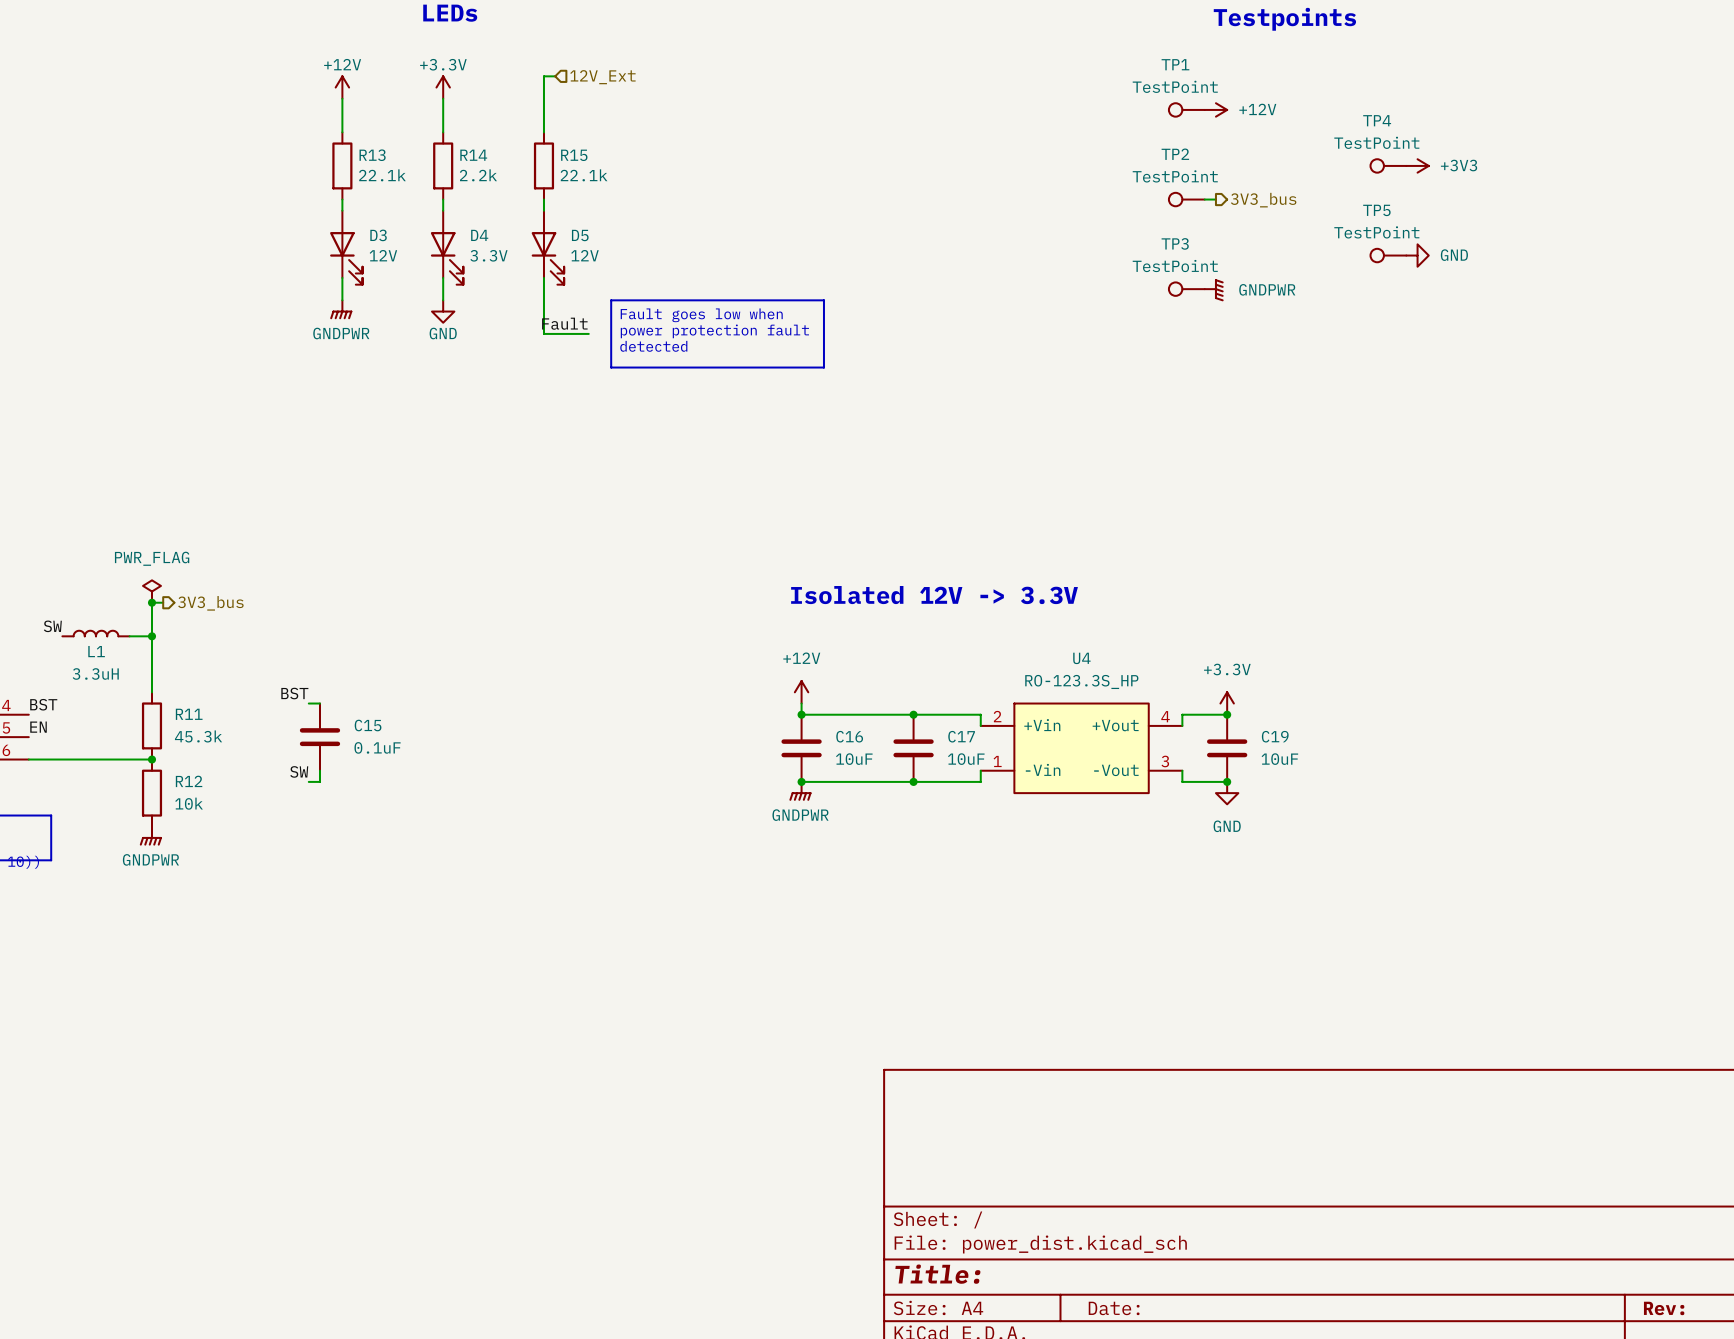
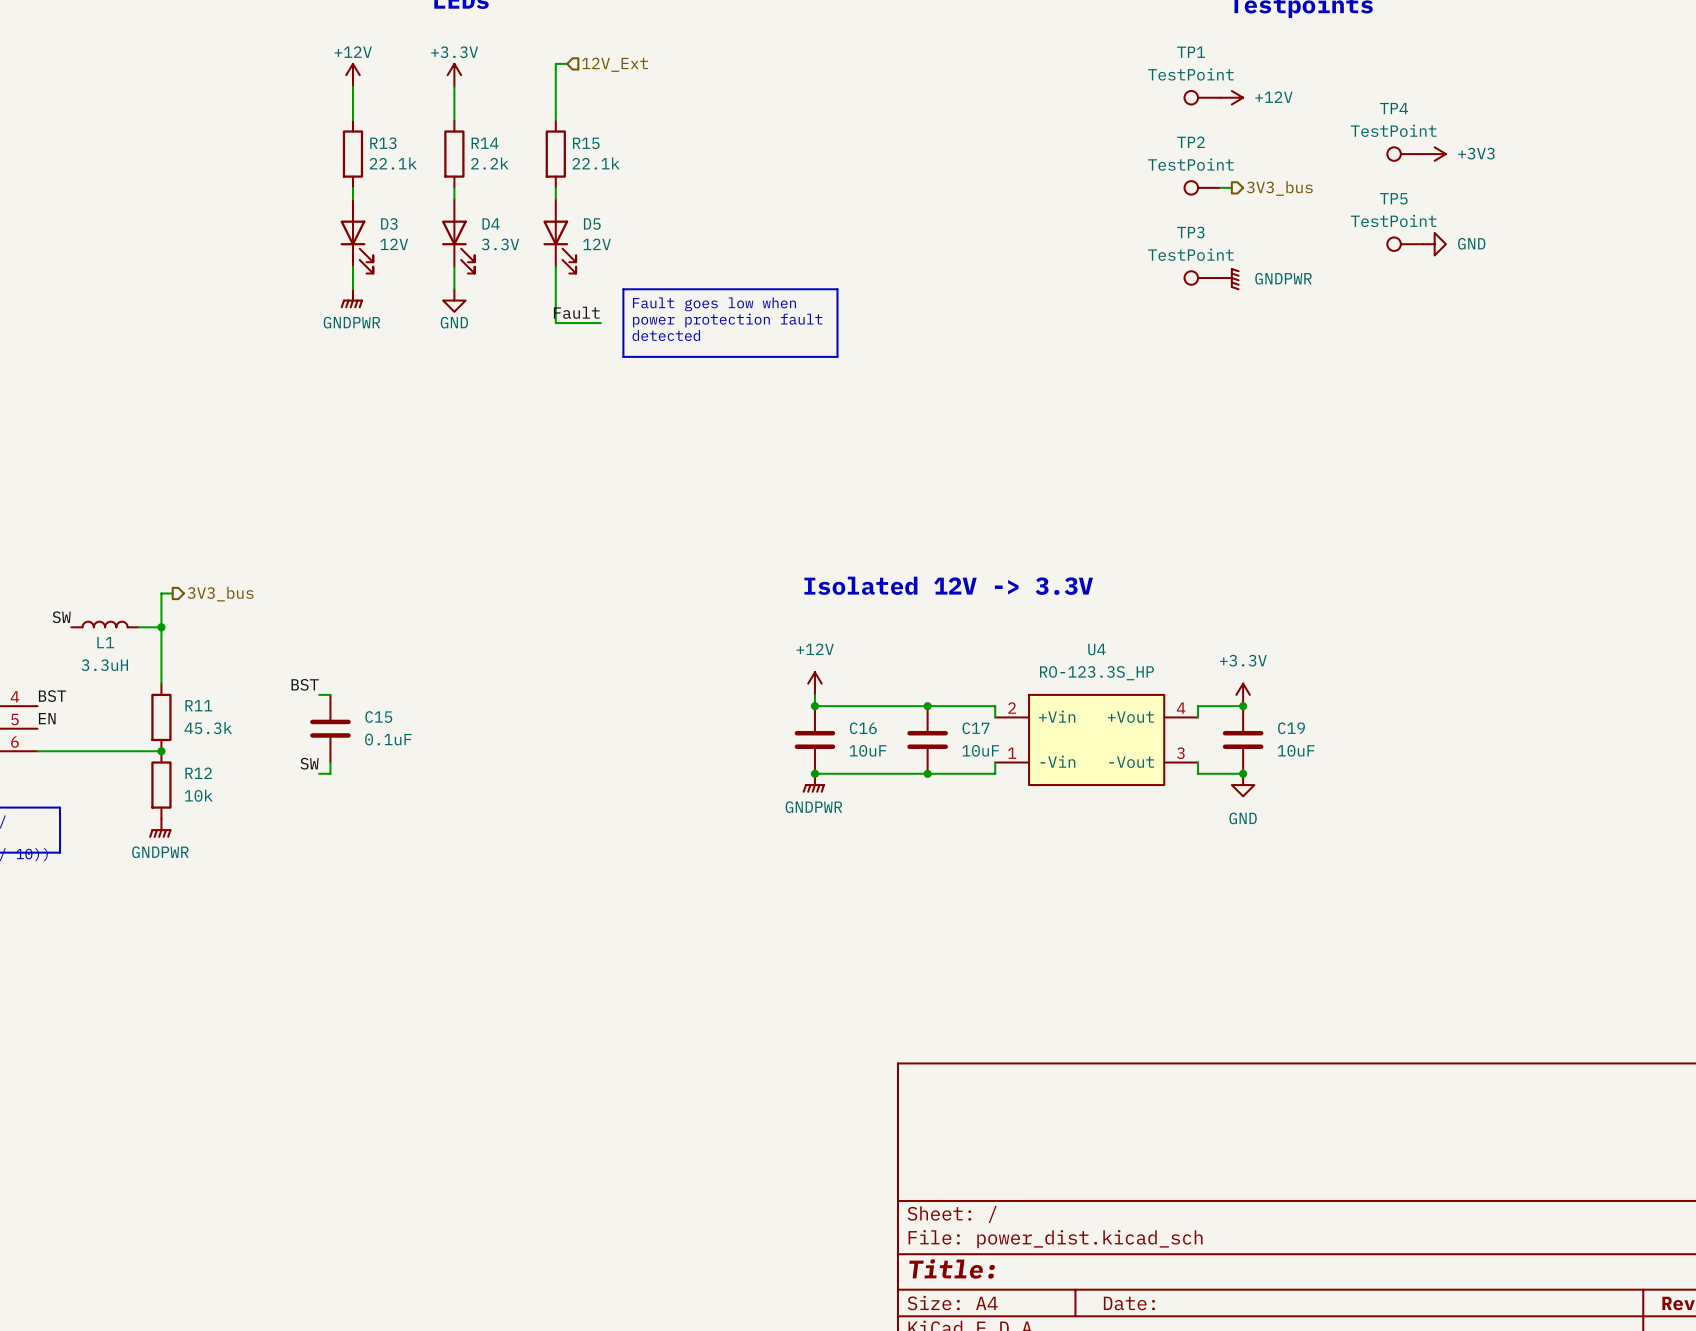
power symbol: PWR_FLAG (152, 591) -> none
junction: (152, 602) -> none

